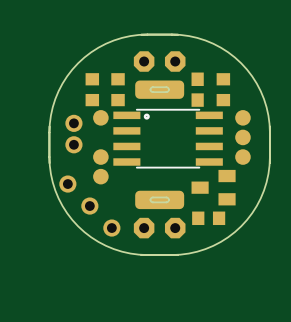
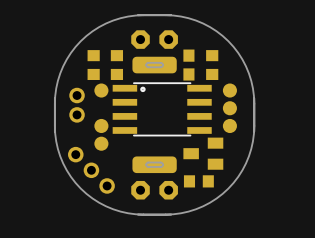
part footprint: [59, 175, 121, 237] -> [68, 146, 115, 194]

